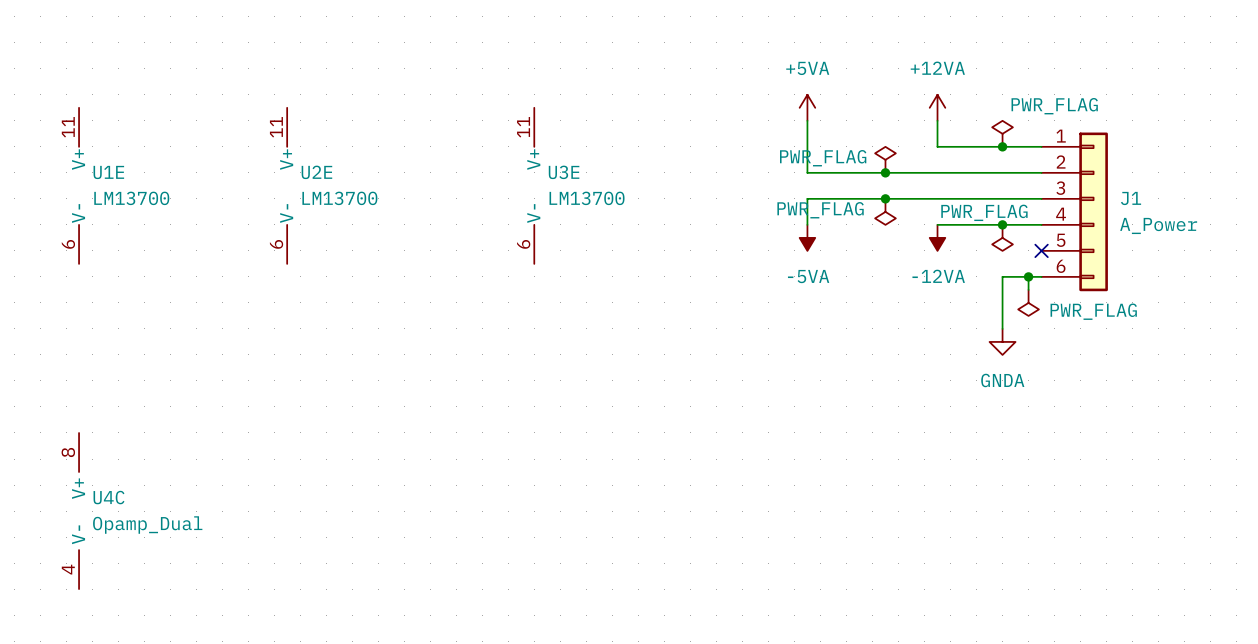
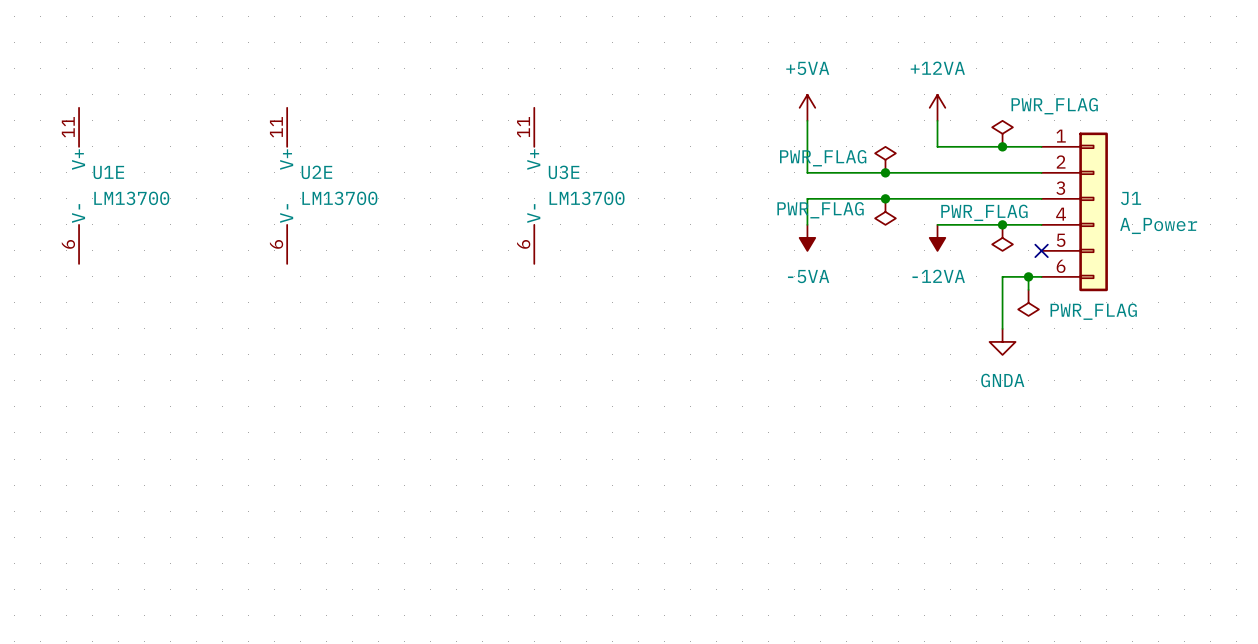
U4C: Opamp_Dual (79, 511) -> none

